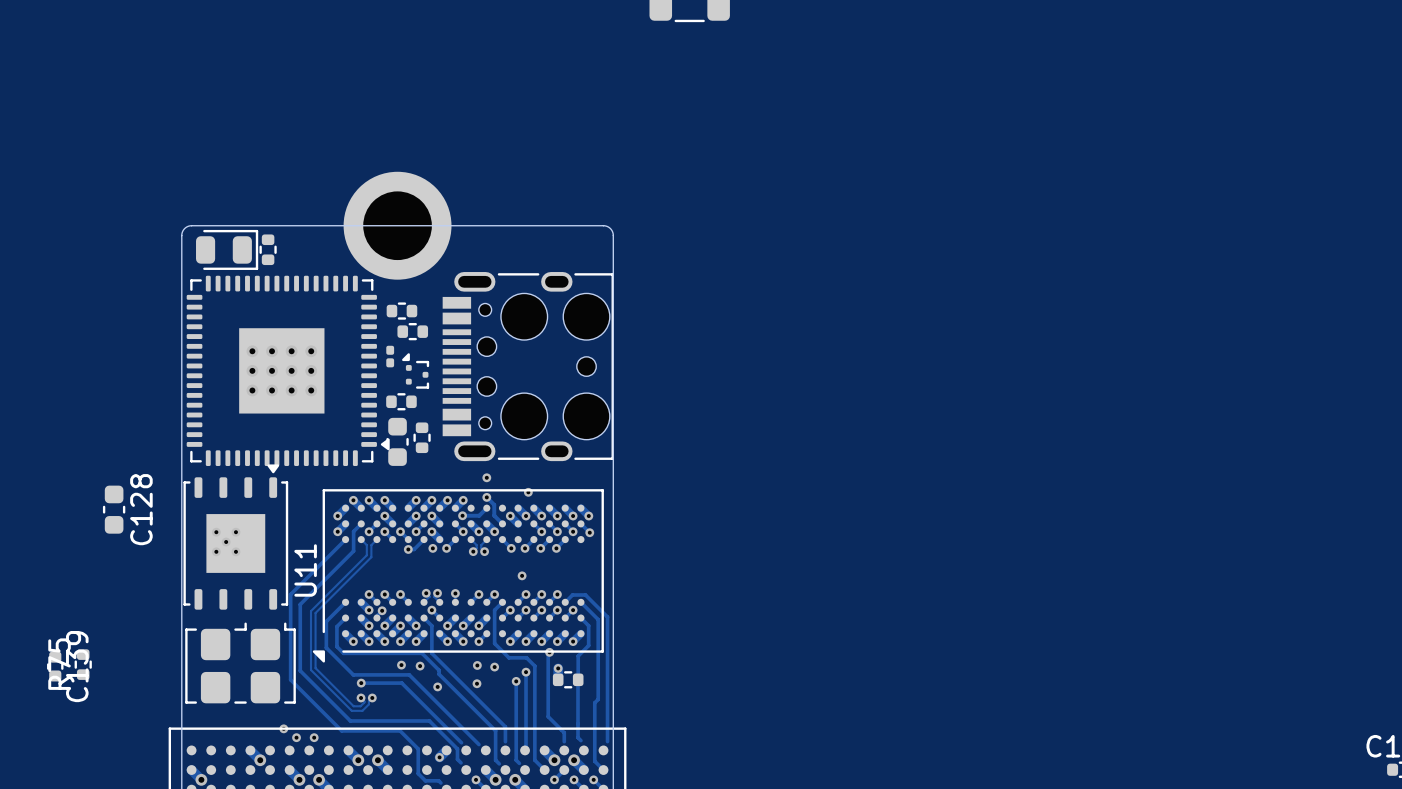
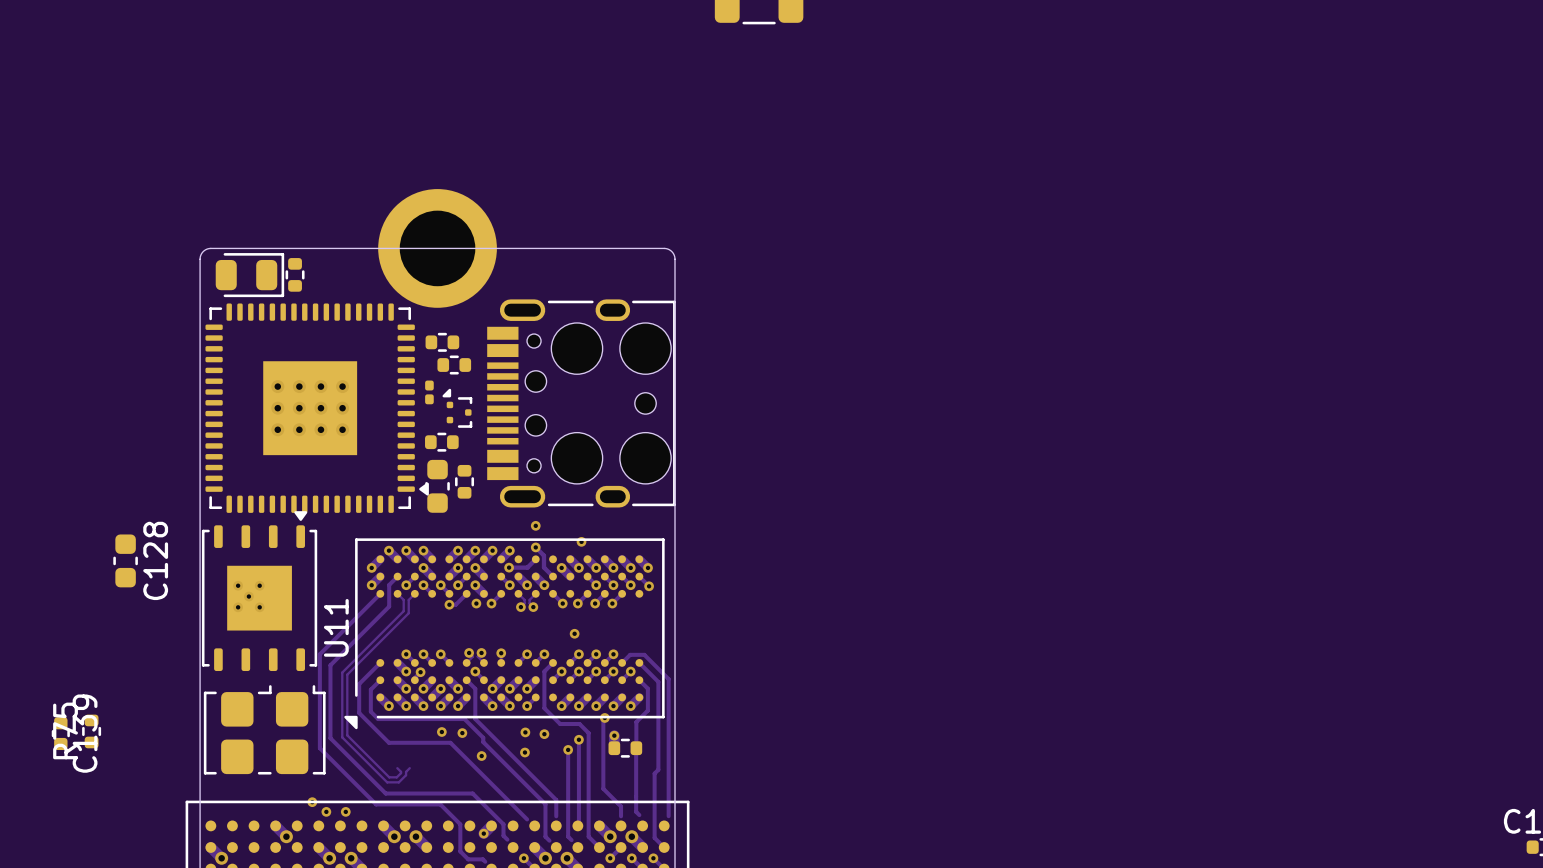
track: (361, 683) (401, 683) (461, 742) -> none
via: (361, 683) -> none
via: (361, 697) -> none
via: (372, 697) -> none

